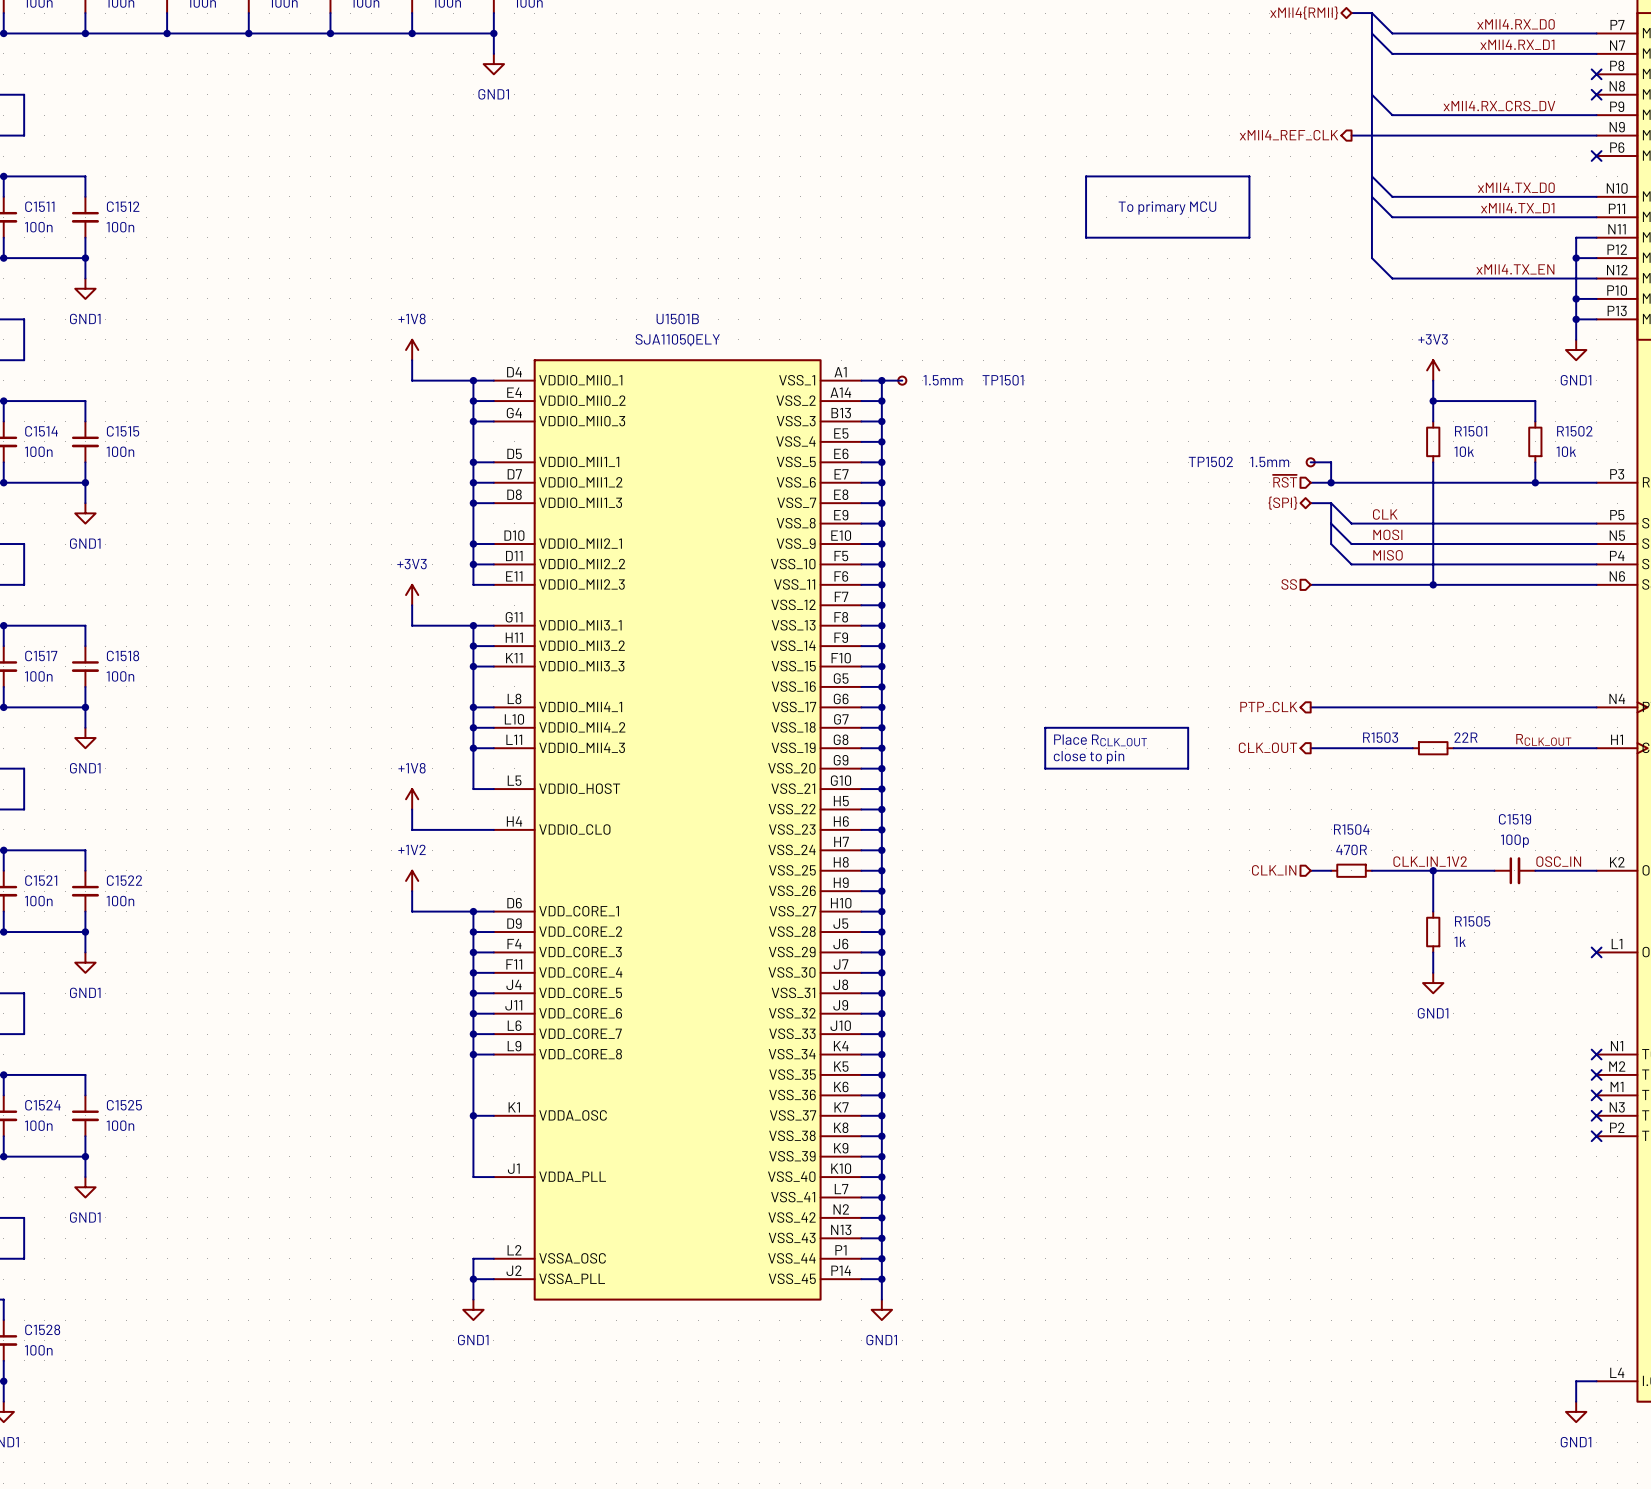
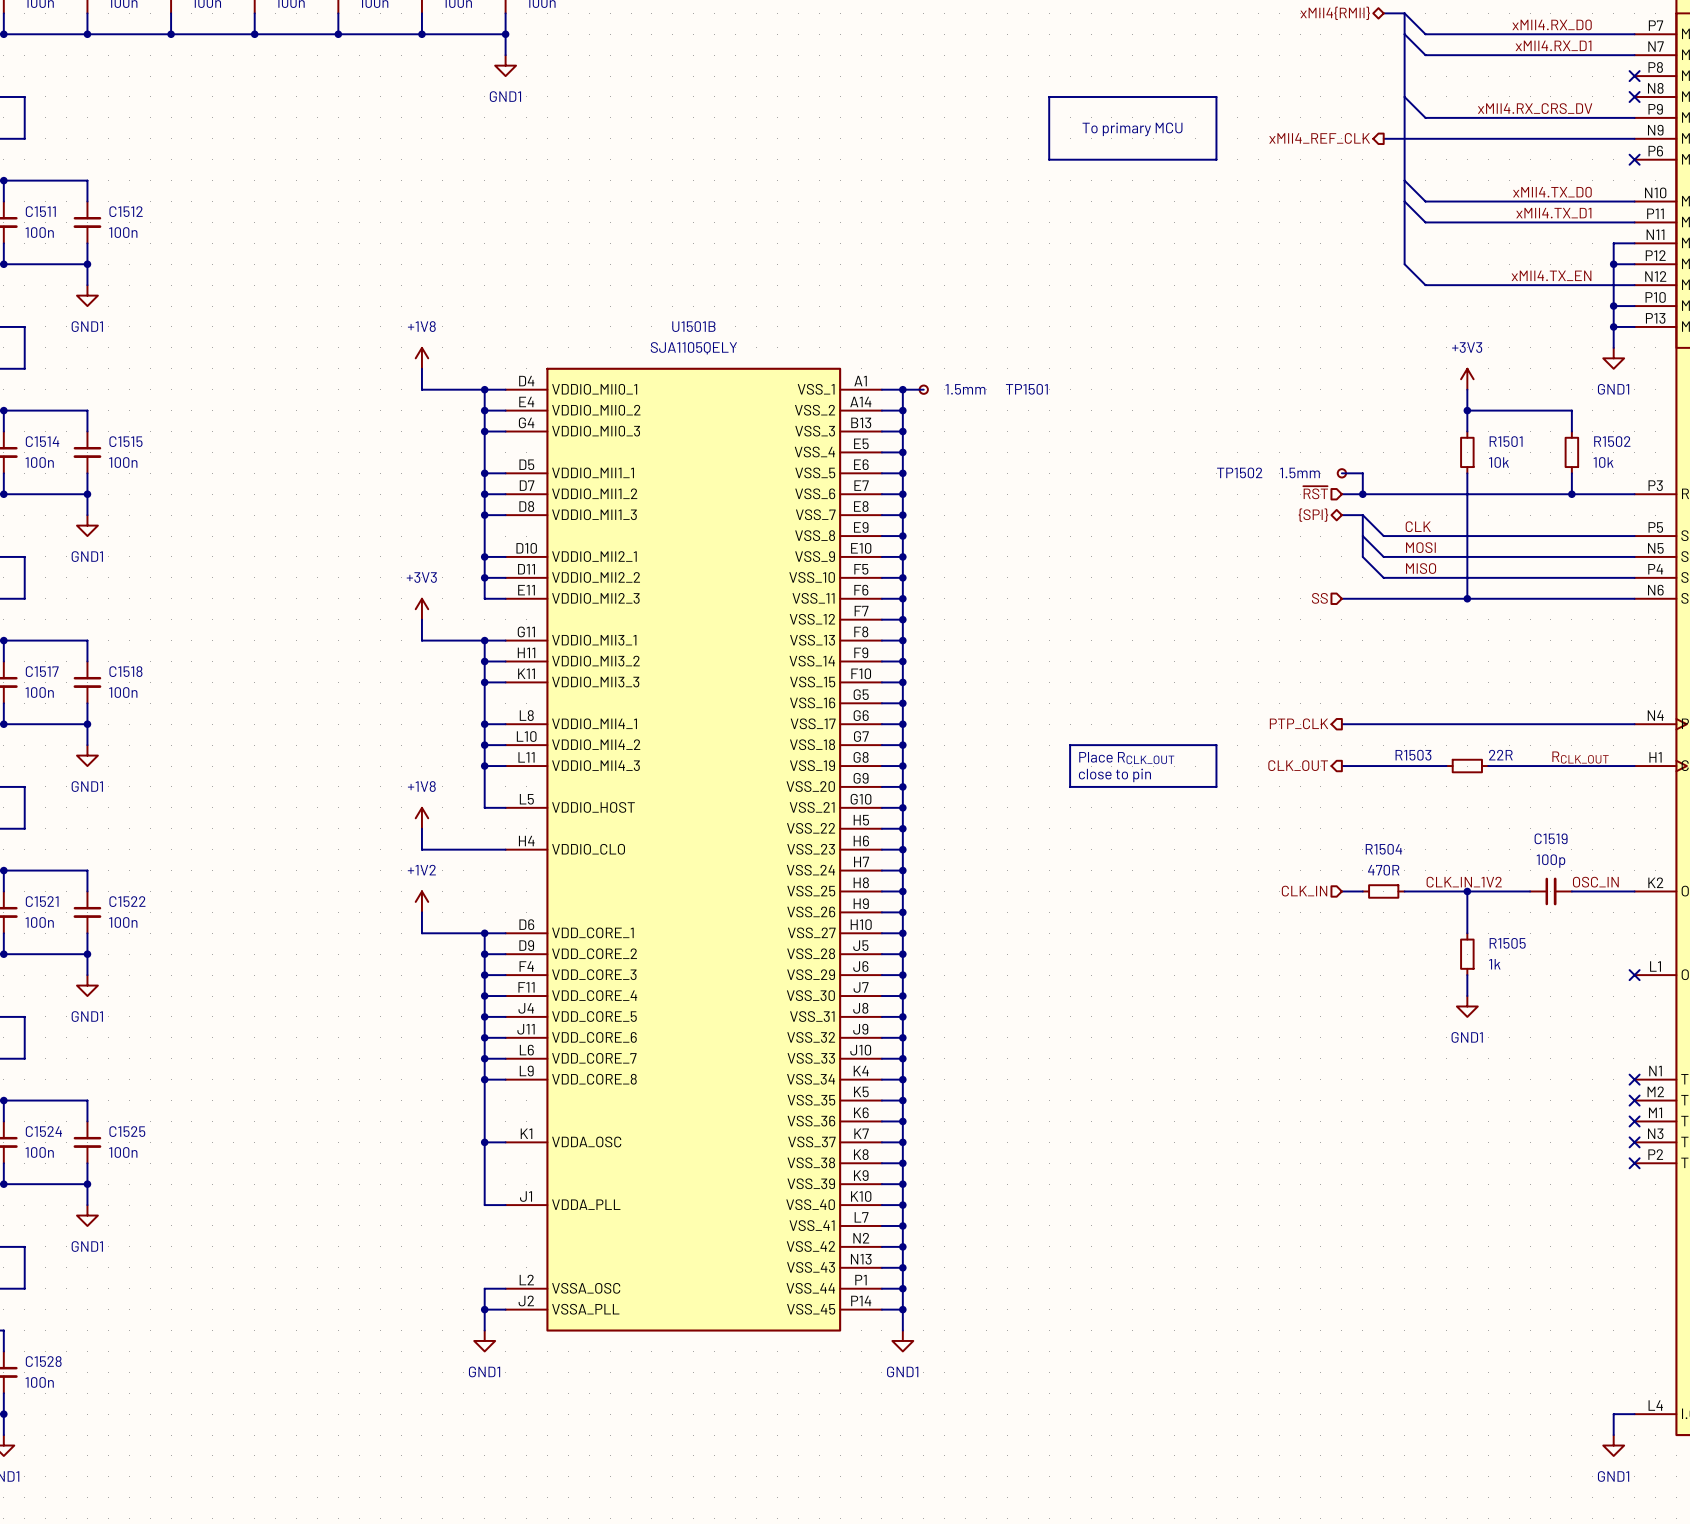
line: (1086, 176) (1249, 176) (1249, 237) (1086, 237) (1086, 176) -> (1049, 96) (1216, 96) (1216, 159) (1049, 159) (1049, 96)
text position: To primary MCU (1167, 208) -> To primary MCU (1132, 129)

